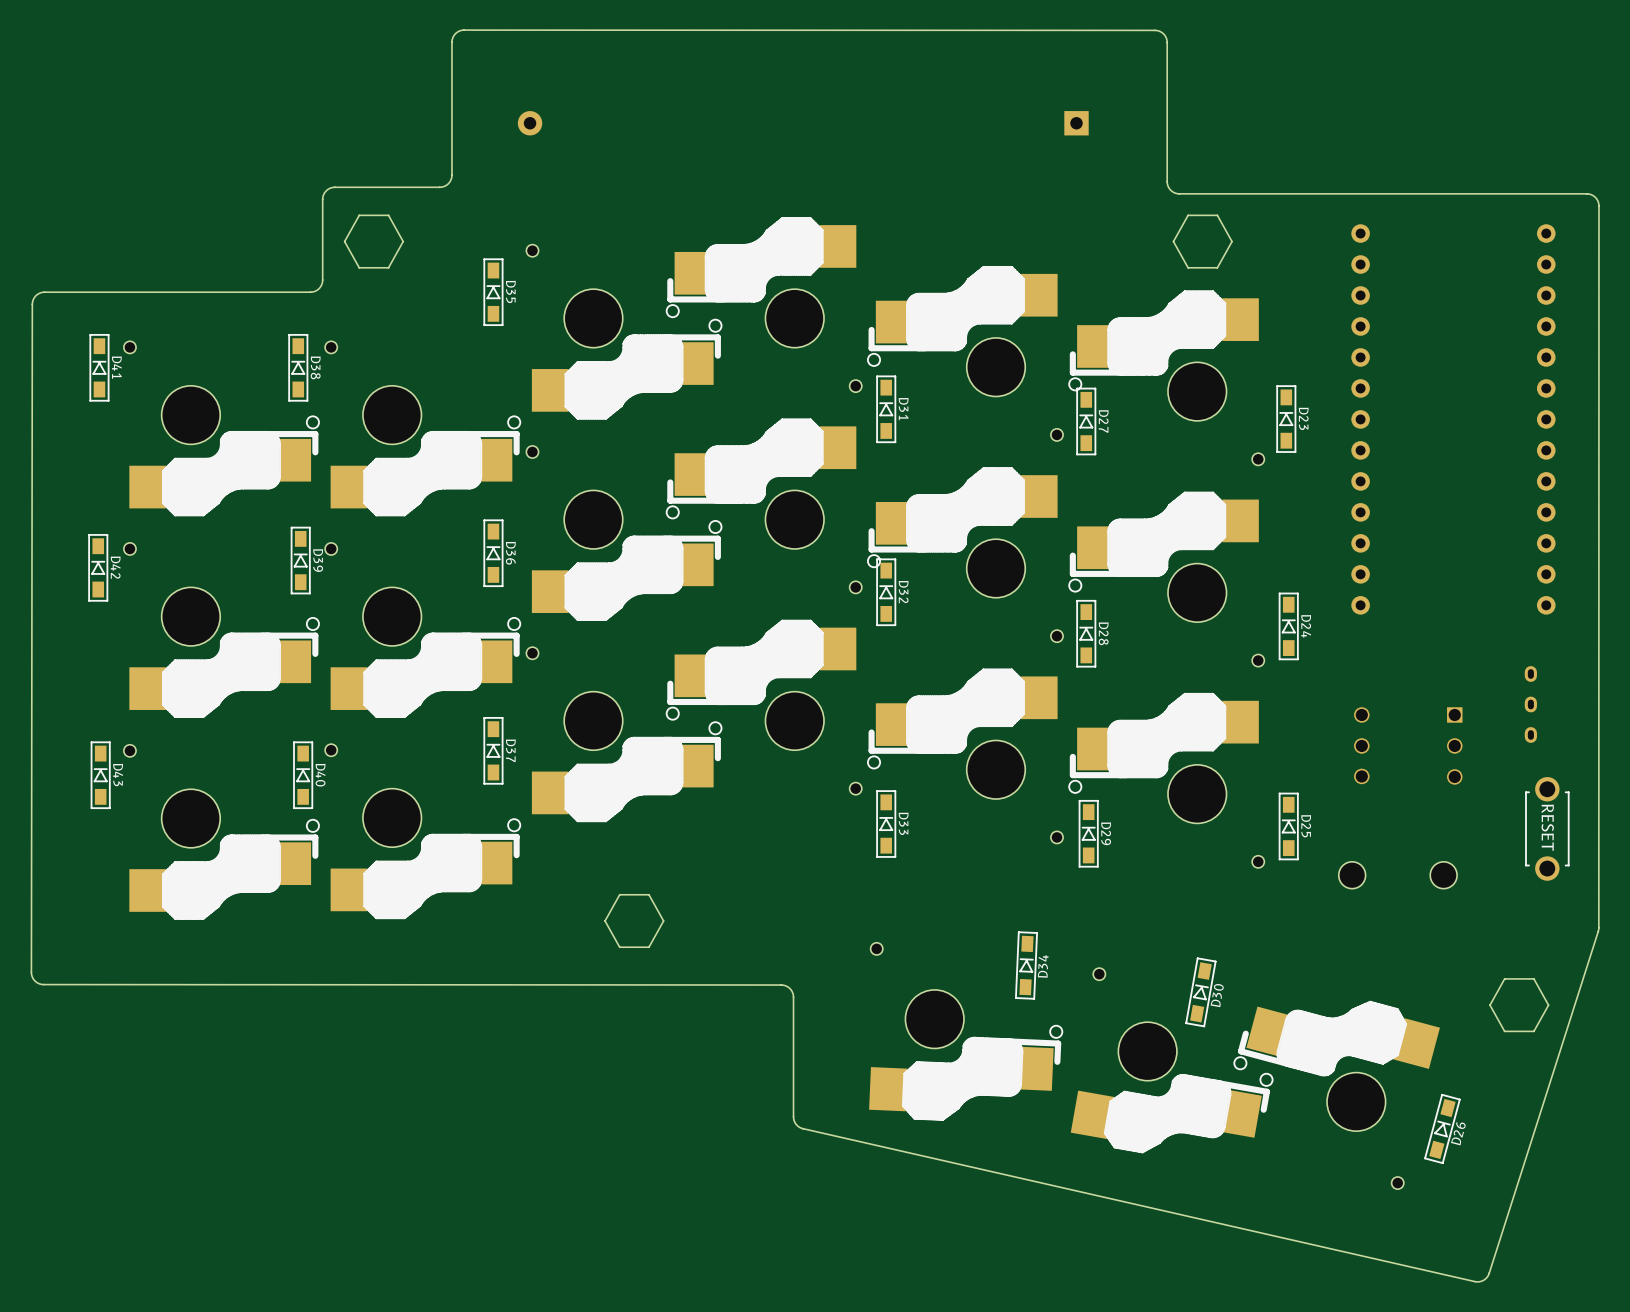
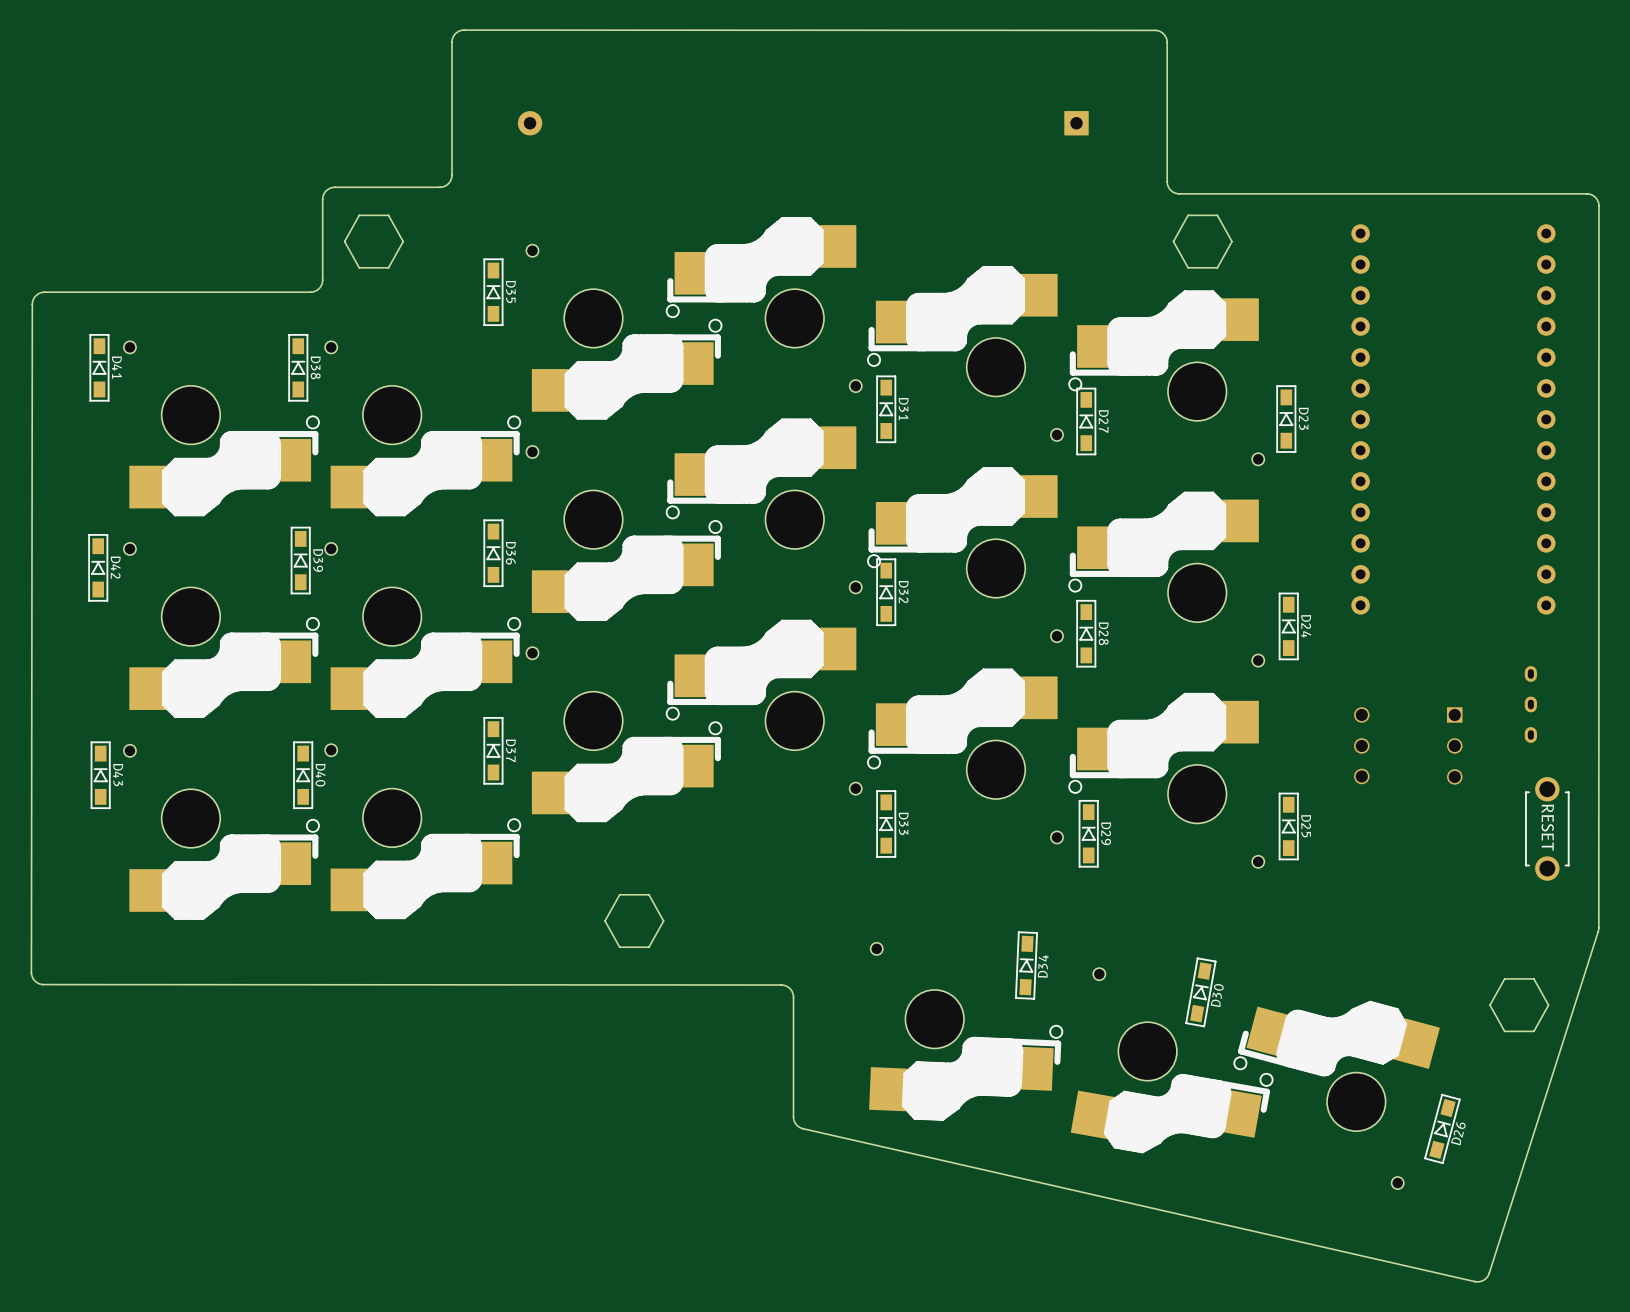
part: (1352, 875) -> none
part: (1443, 875) -> none

